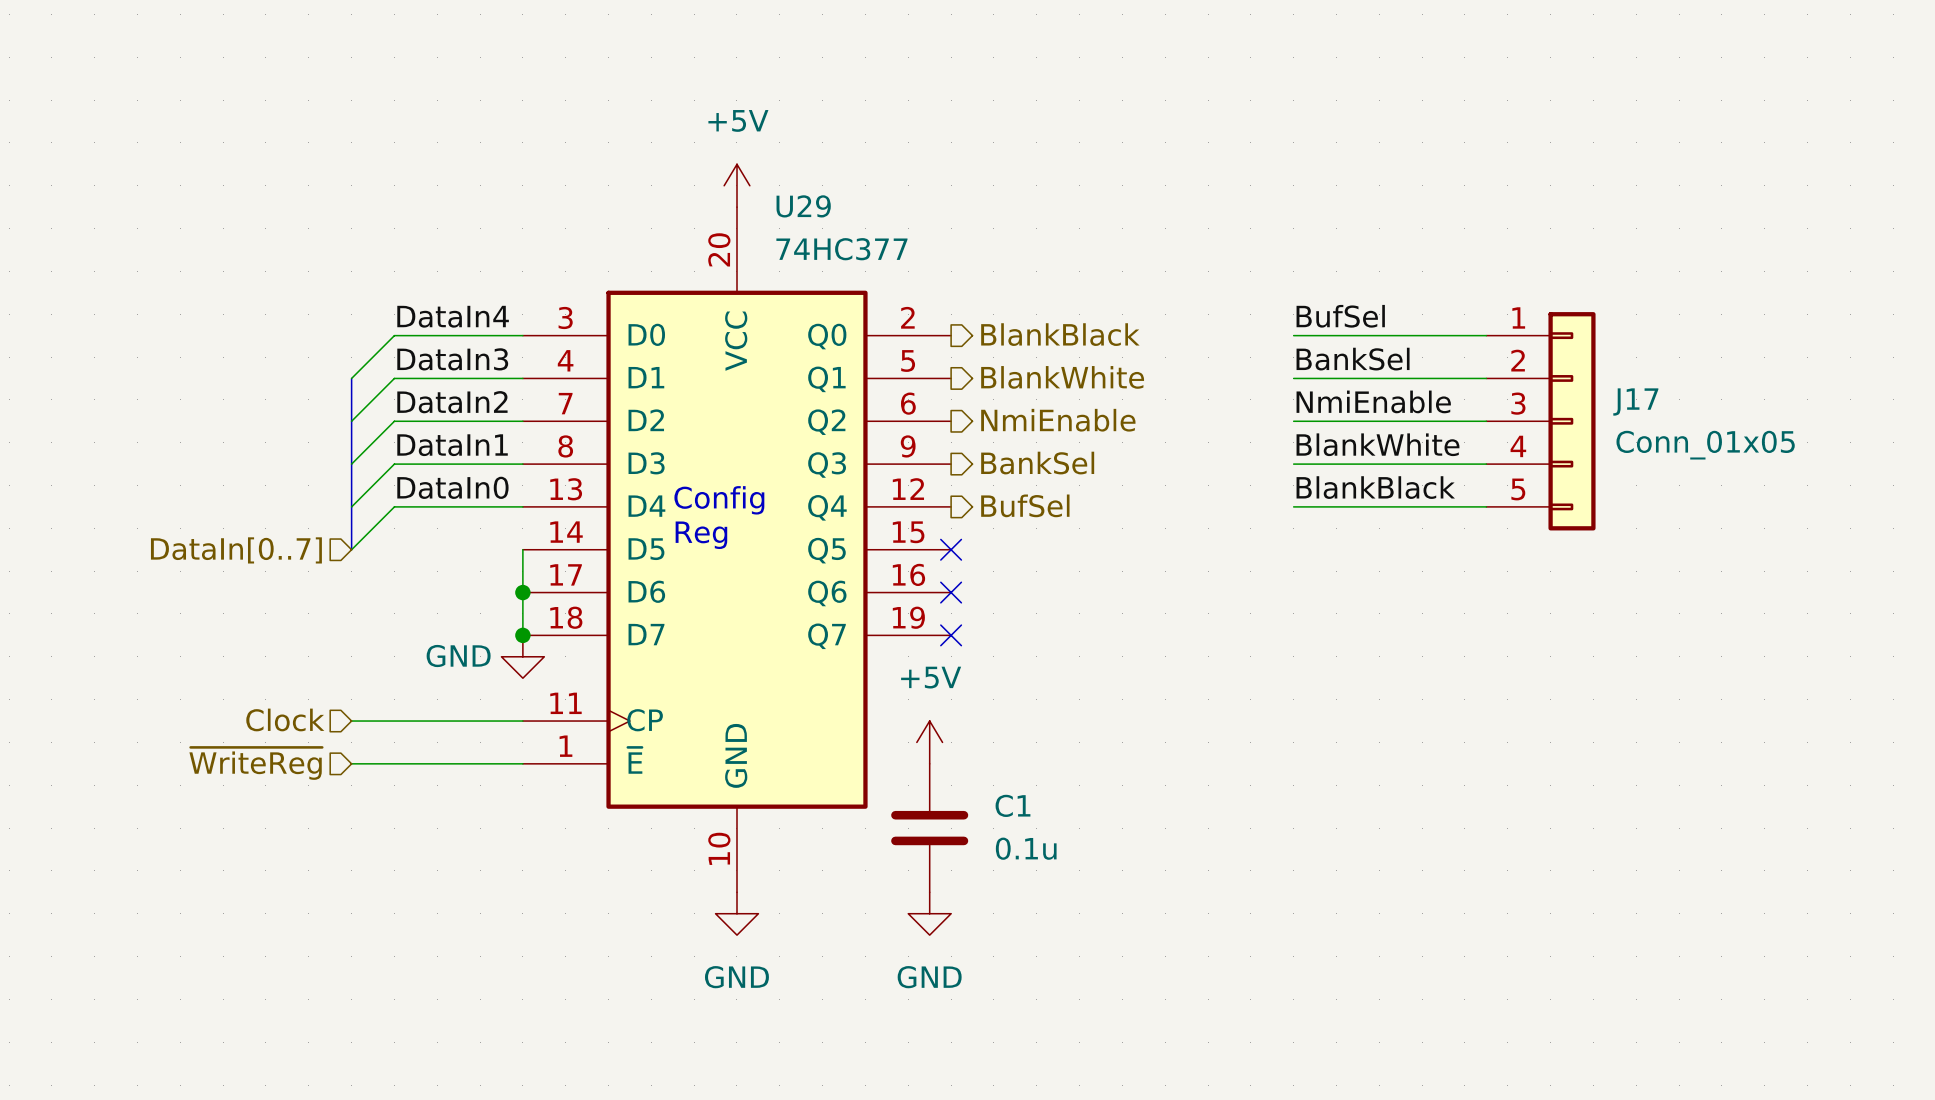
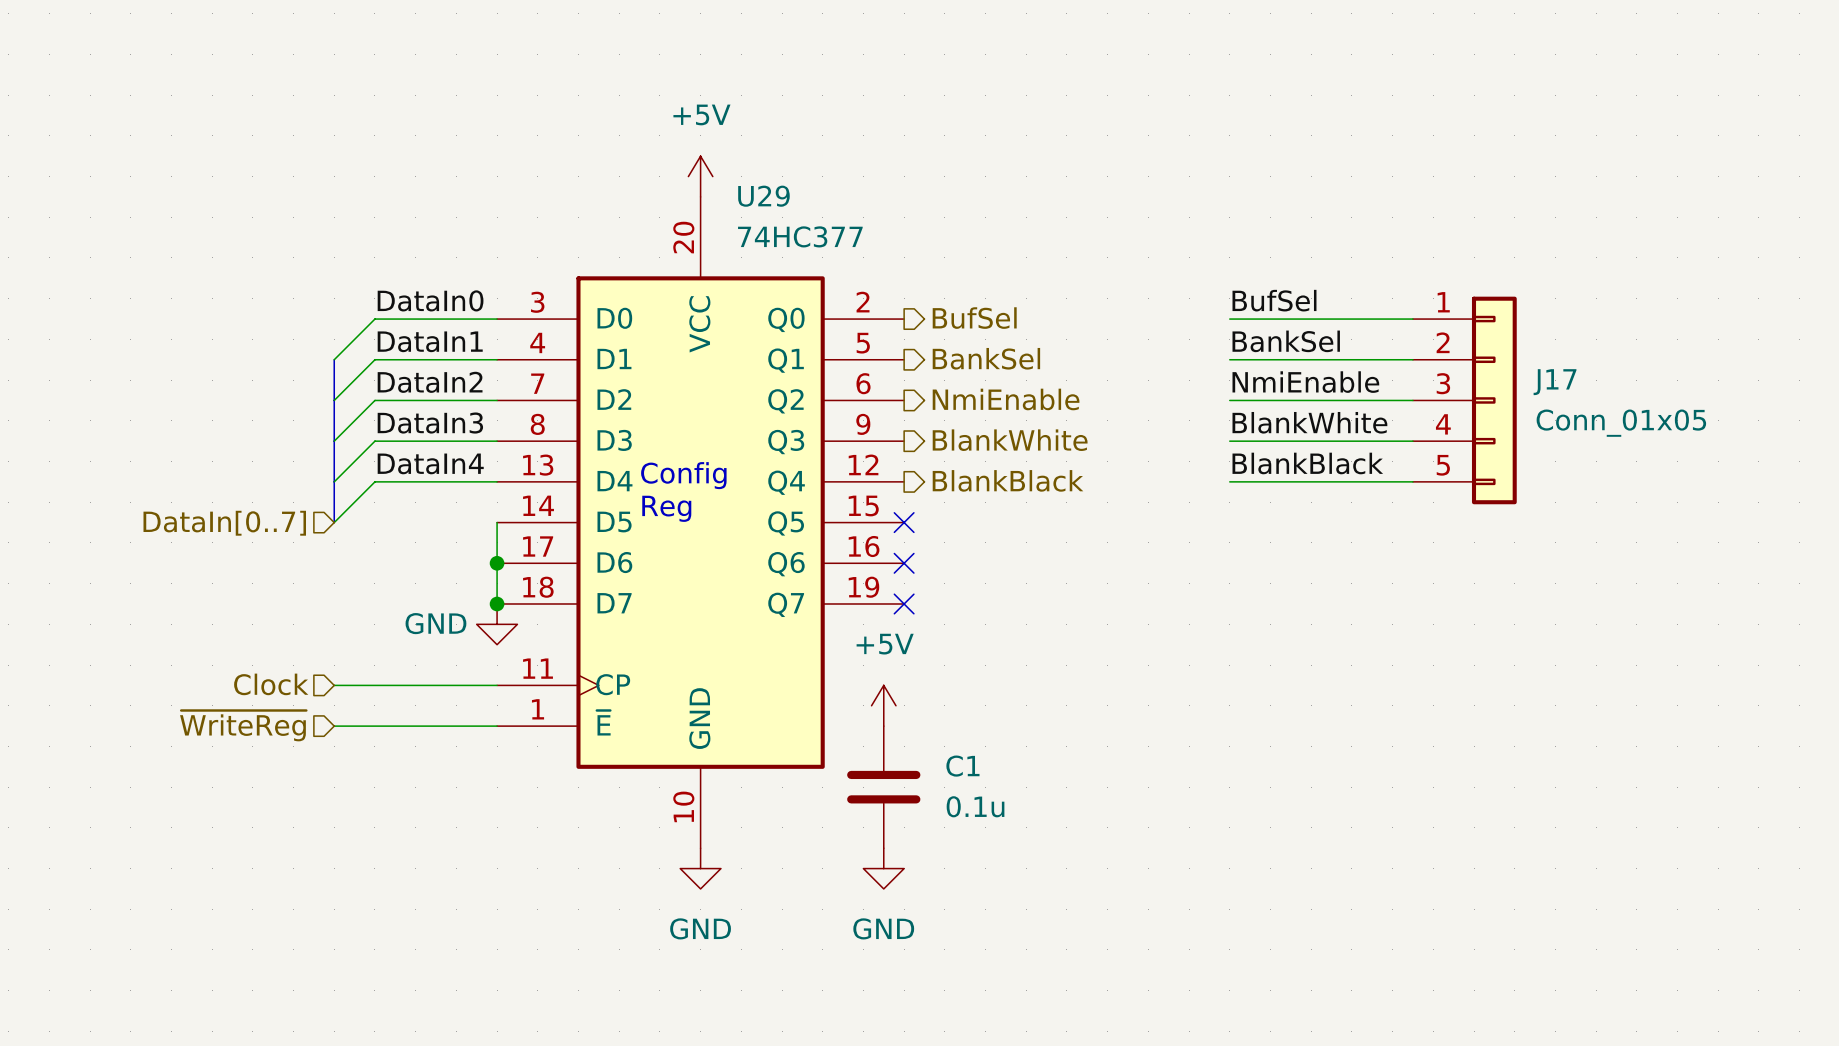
label: DataIn4 (453, 316) -> DataIn0 (430, 300)
hierarchical label: BlankBlack (1060, 334) -> BufSel (974, 318)
label: DataIn3 (452, 359) -> DataIn1 (430, 341)
hierarchical label: BlankWhite (1062, 377) -> BankSel (986, 358)
label: DataIn1 (452, 445) -> DataIn3 (430, 423)
hierarchical label: BankSel (1037, 463) -> BlankWhite (1010, 440)
label: DataIn0 (452, 487) -> DataIn4 (430, 463)
hierarchical label: BufSel (1025, 505) -> BlankBlack (1008, 480)

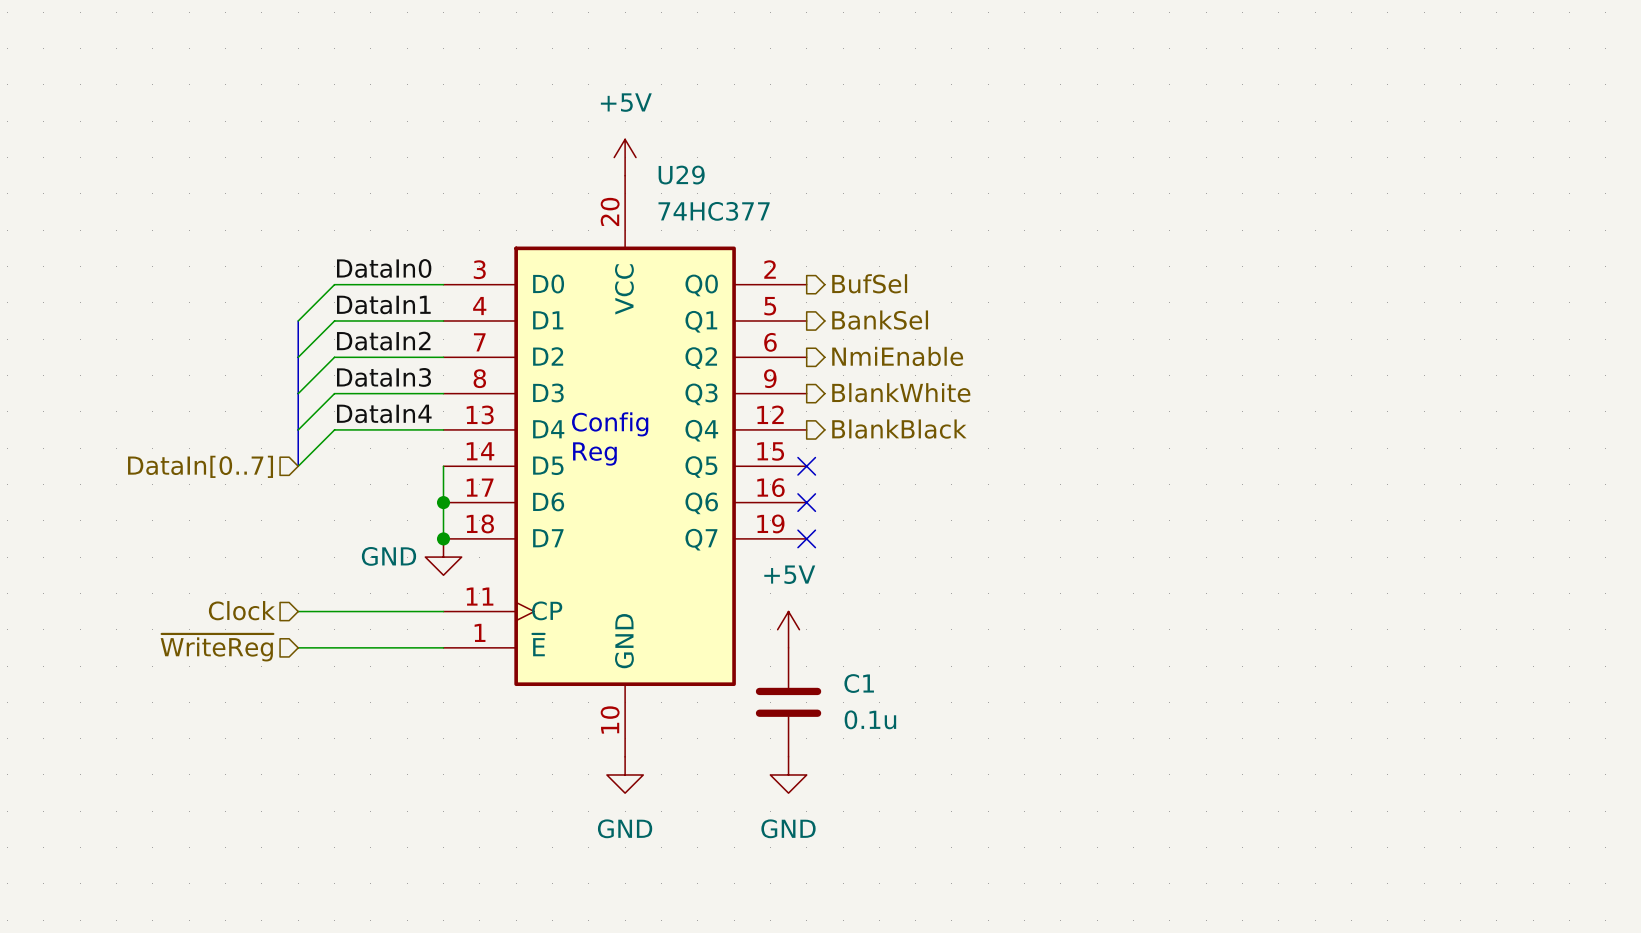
label: BufSel (1274, 300) -> none
wire: (1229, 319) (1412, 319) -> none
label: BankSel (1286, 341) -> none
wire: (1229, 359) (1412, 359) -> none
label: NmiEnable (1305, 382) -> none
wire: (1229, 400) (1412, 400) -> none
J17: Conn_01x05 (1464, 400) -> none
label: BlankWhite (1309, 422) -> none
wire: (1229, 441) (1412, 441) -> none
label: BlankBlack (1307, 463) -> none
wire: (1229, 481) (1412, 481) -> none

